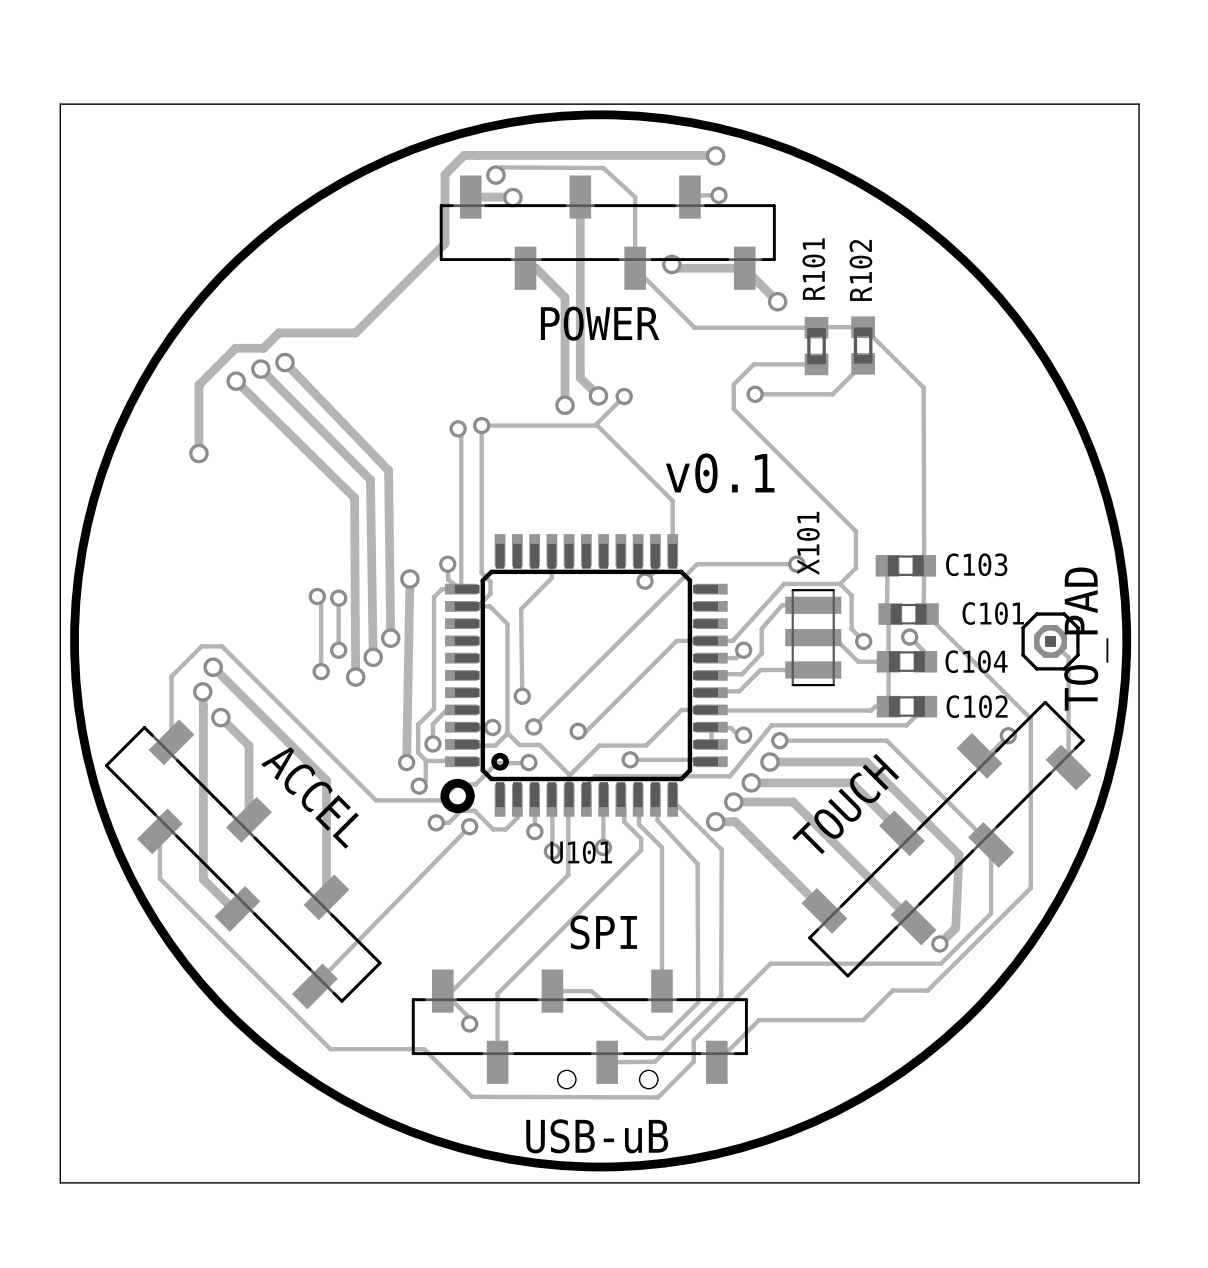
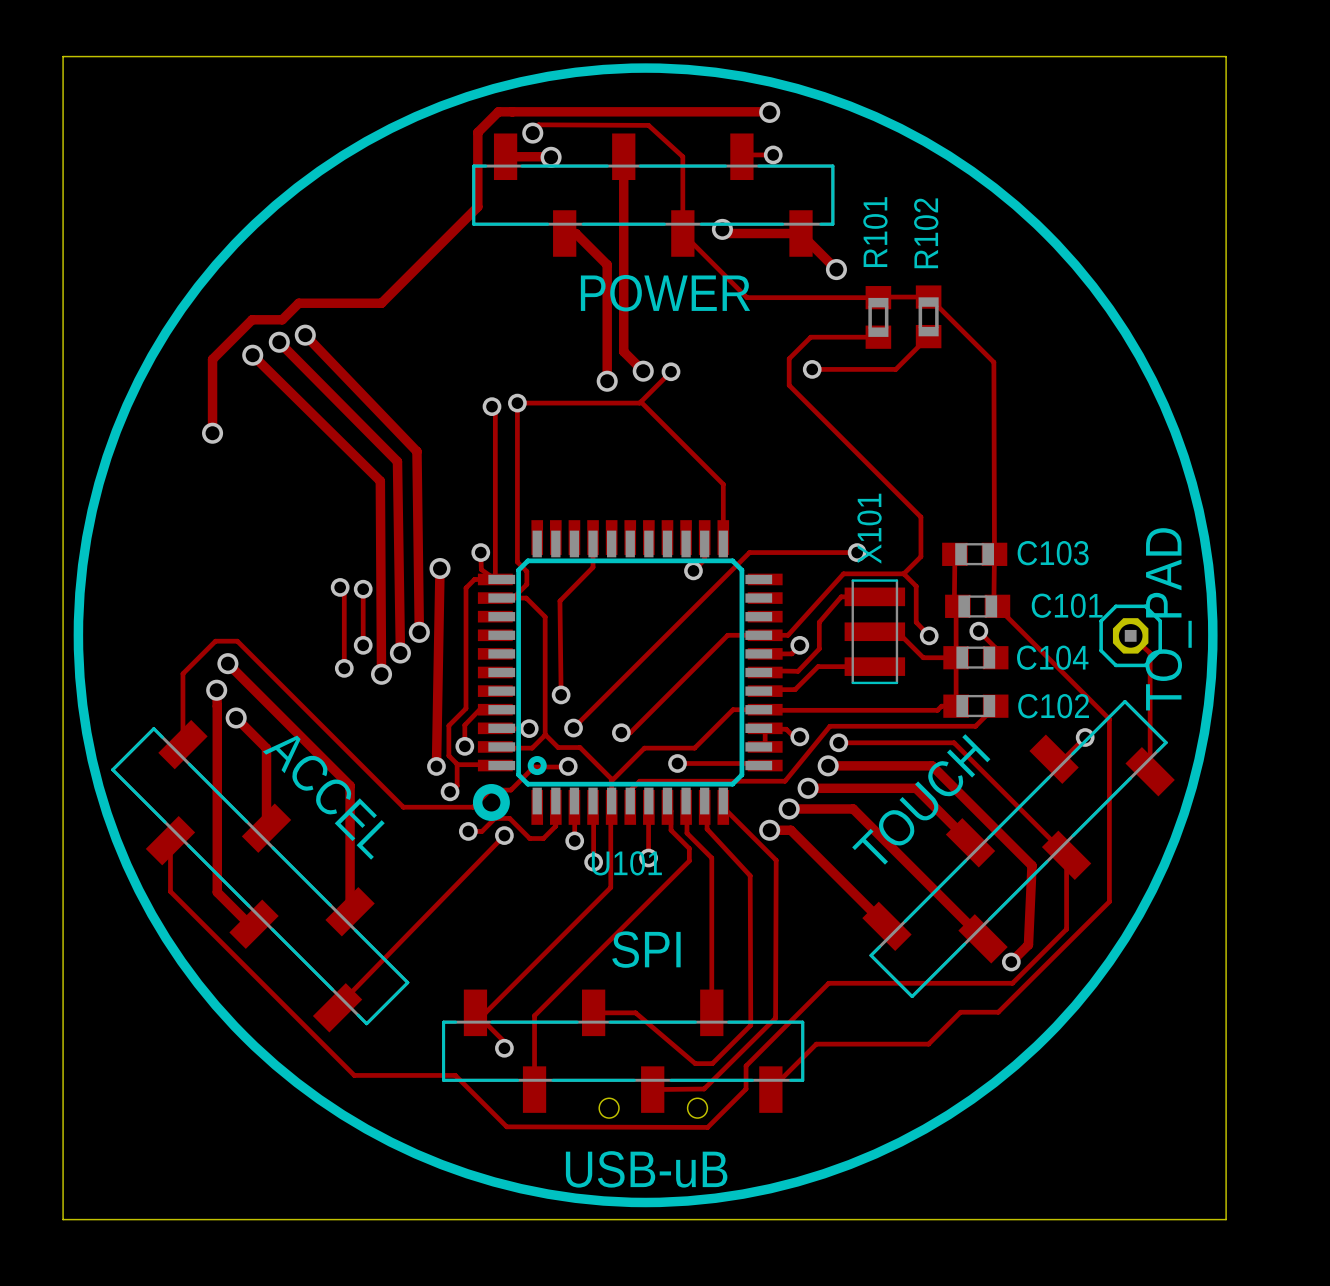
text: v0.1 (720, 473) -> none

